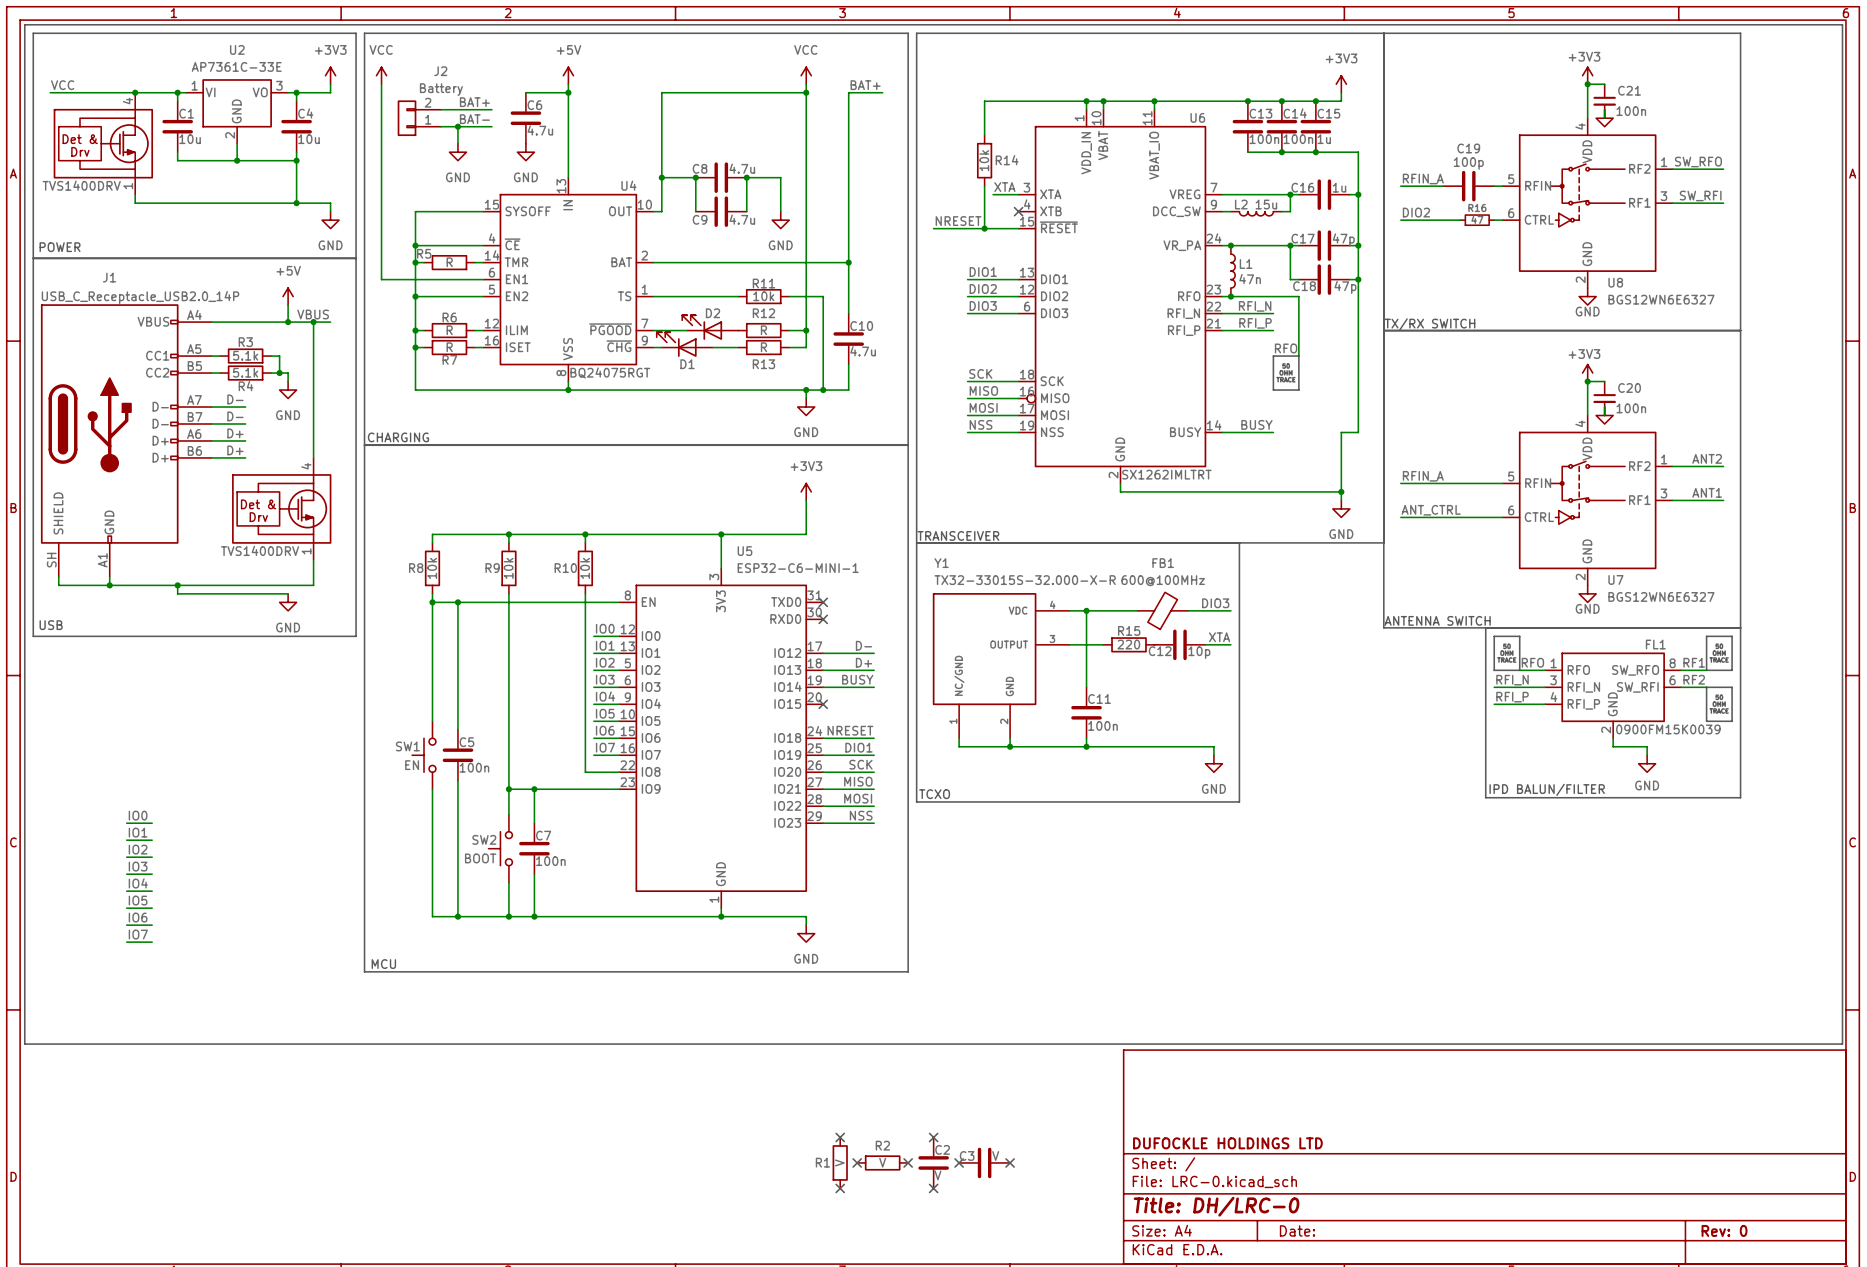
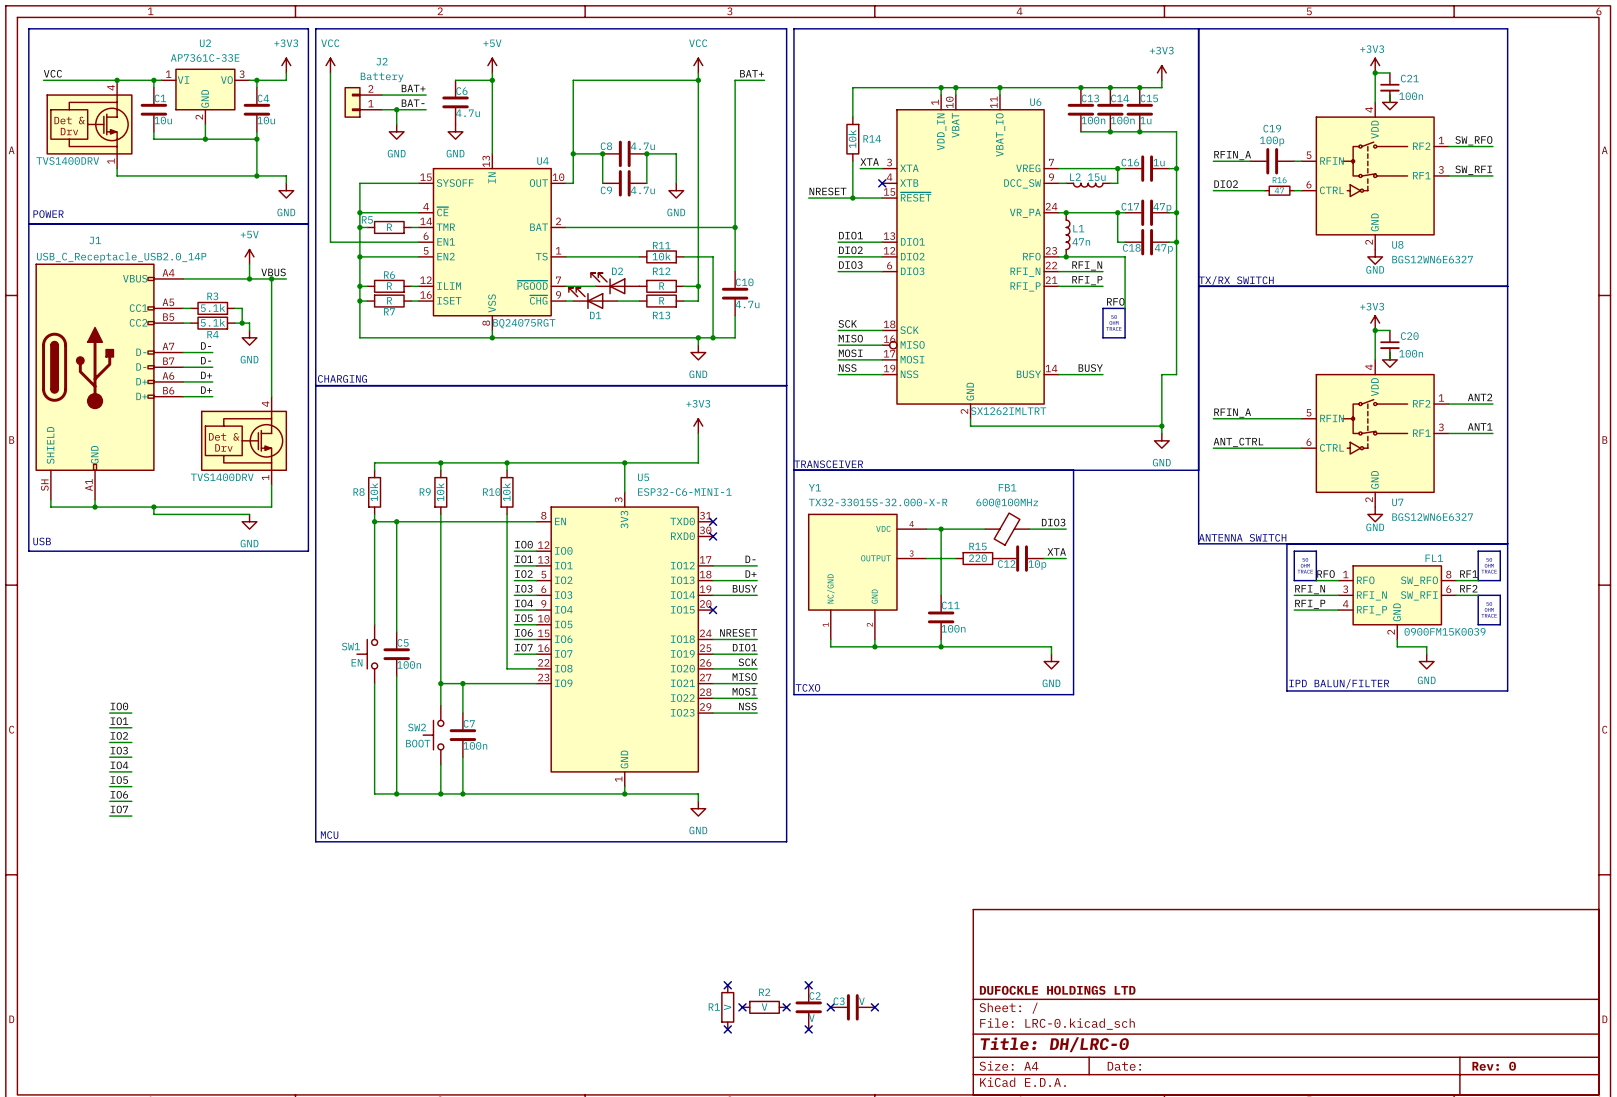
line: (24, 24) (1842, 24) (1842, 1044) (24, 1044) (24, 24) -> none

